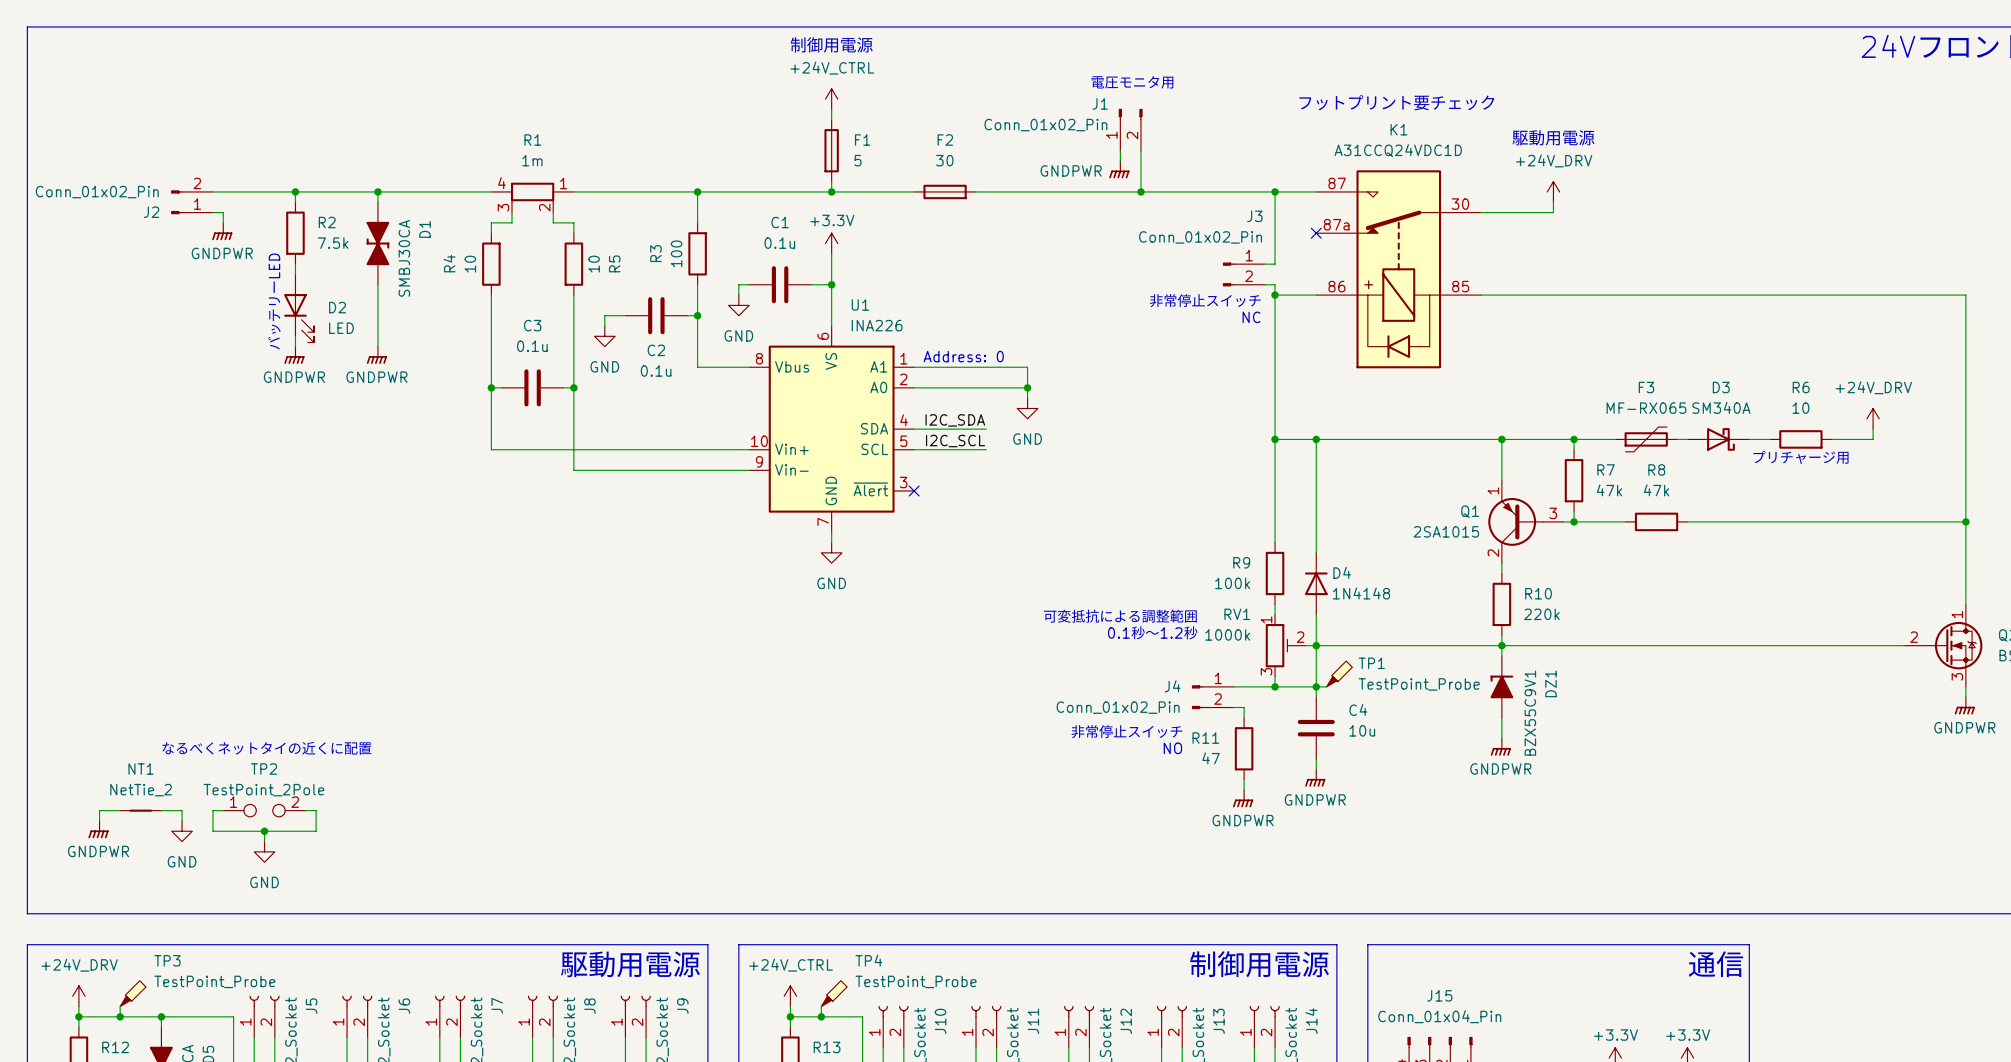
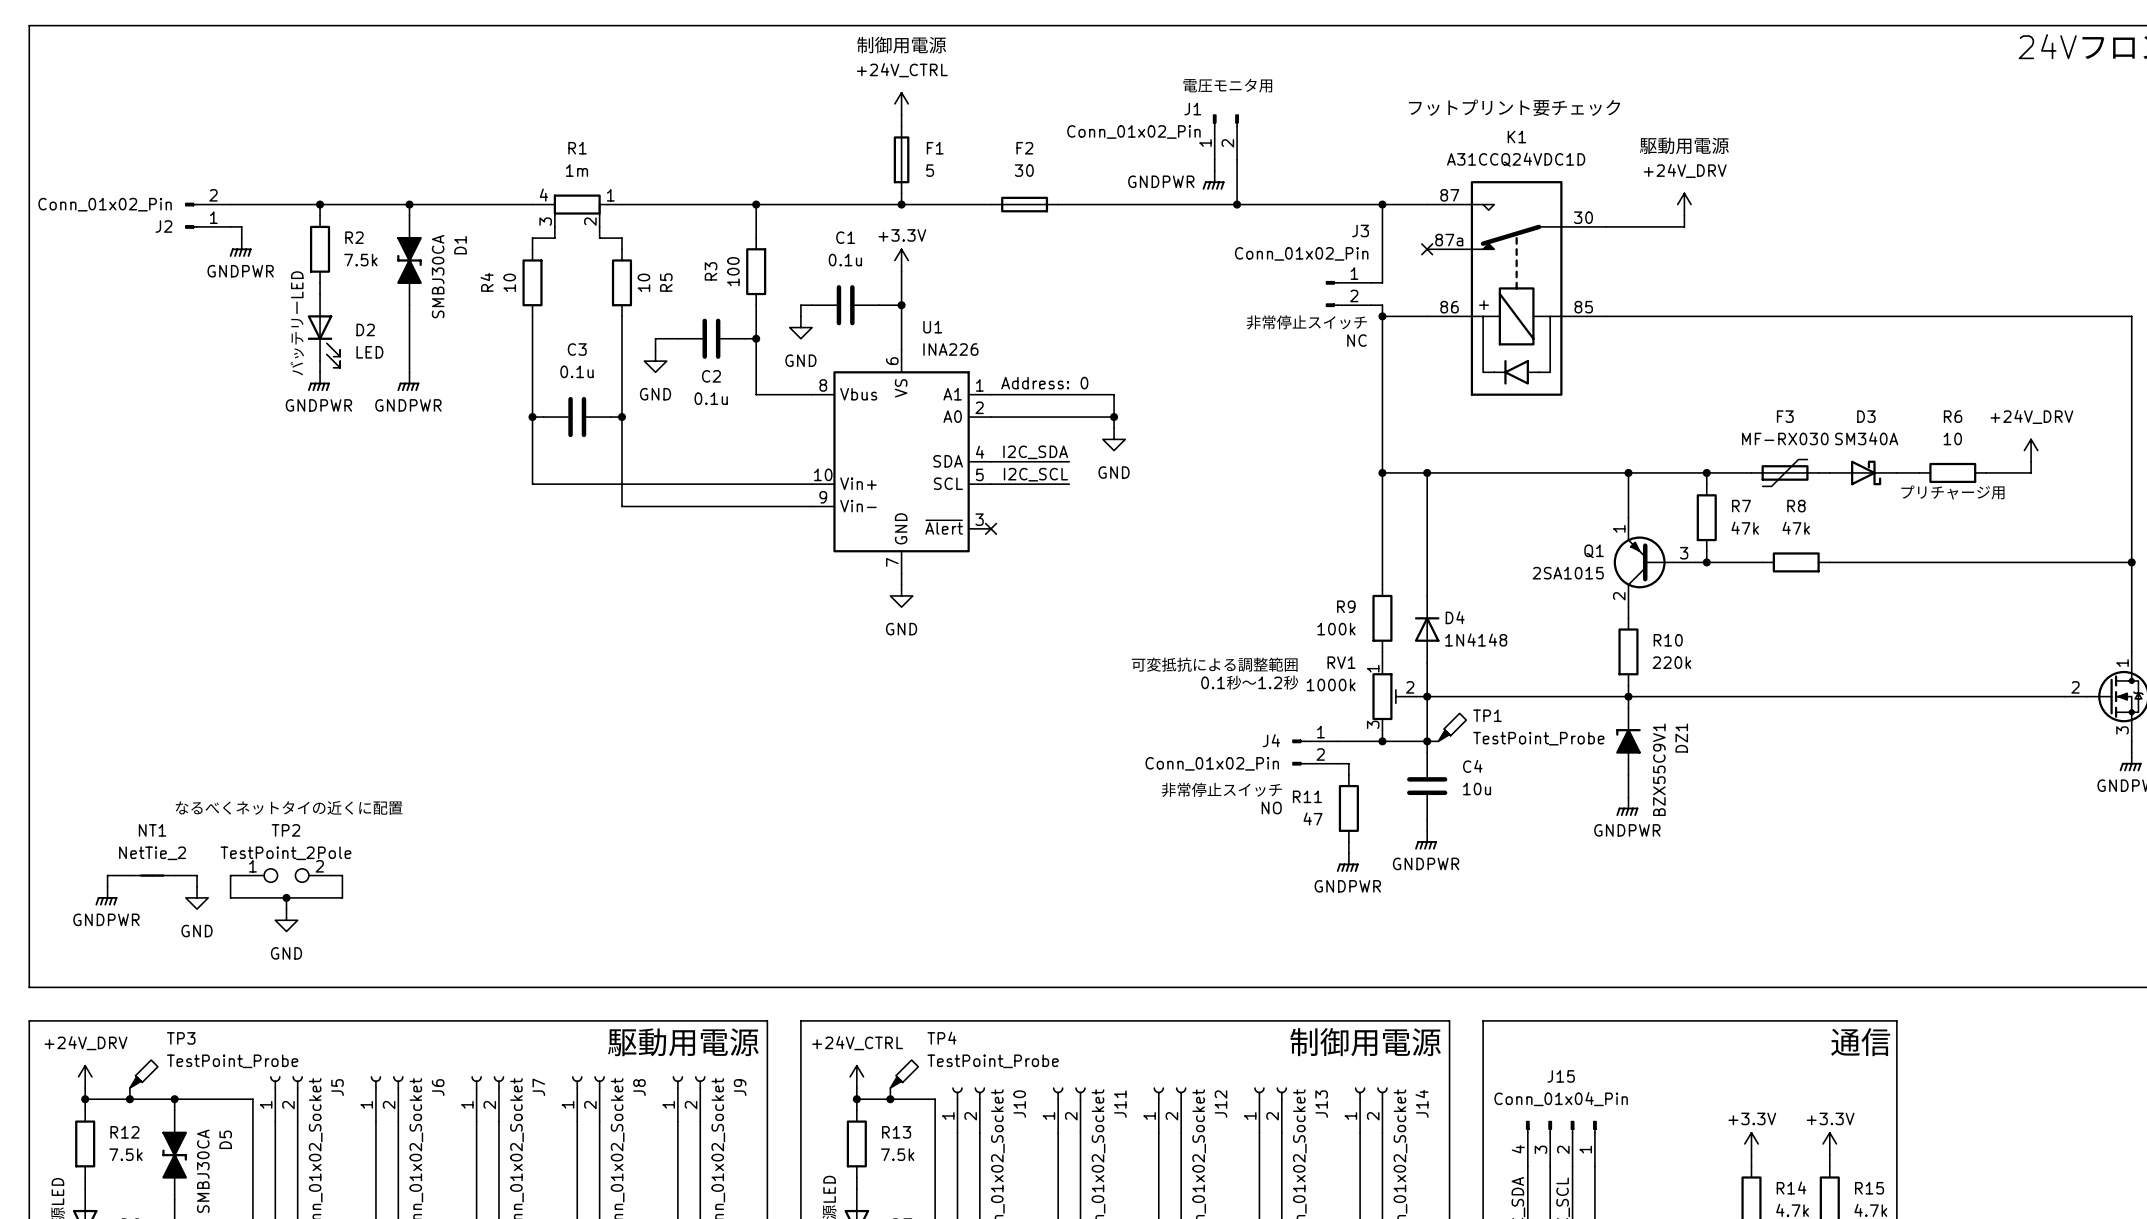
F3 value: MF-RX065 (1646, 408) -> MF-RX030 (1785, 438)

